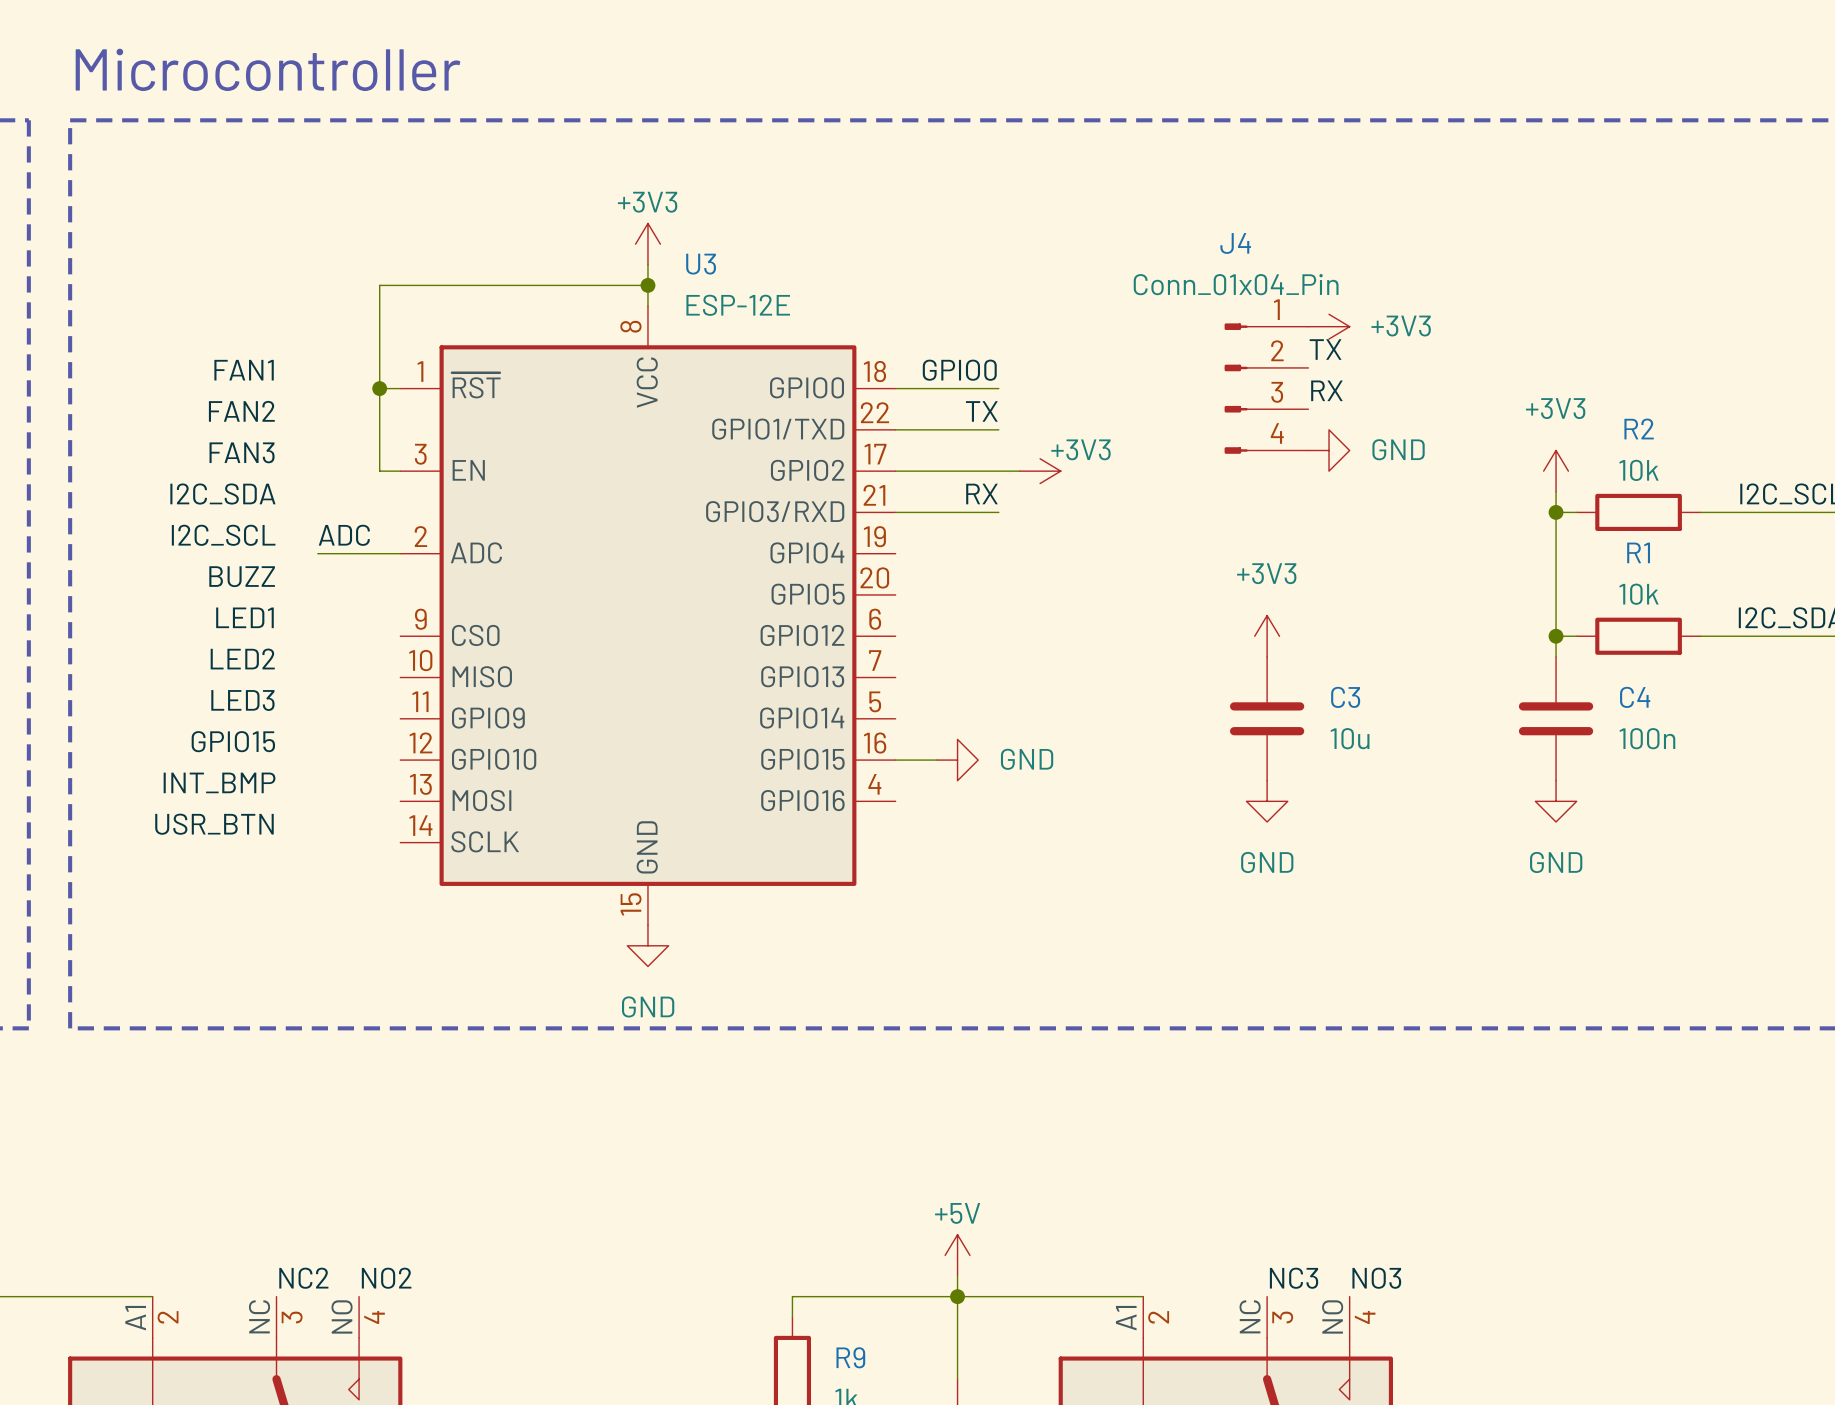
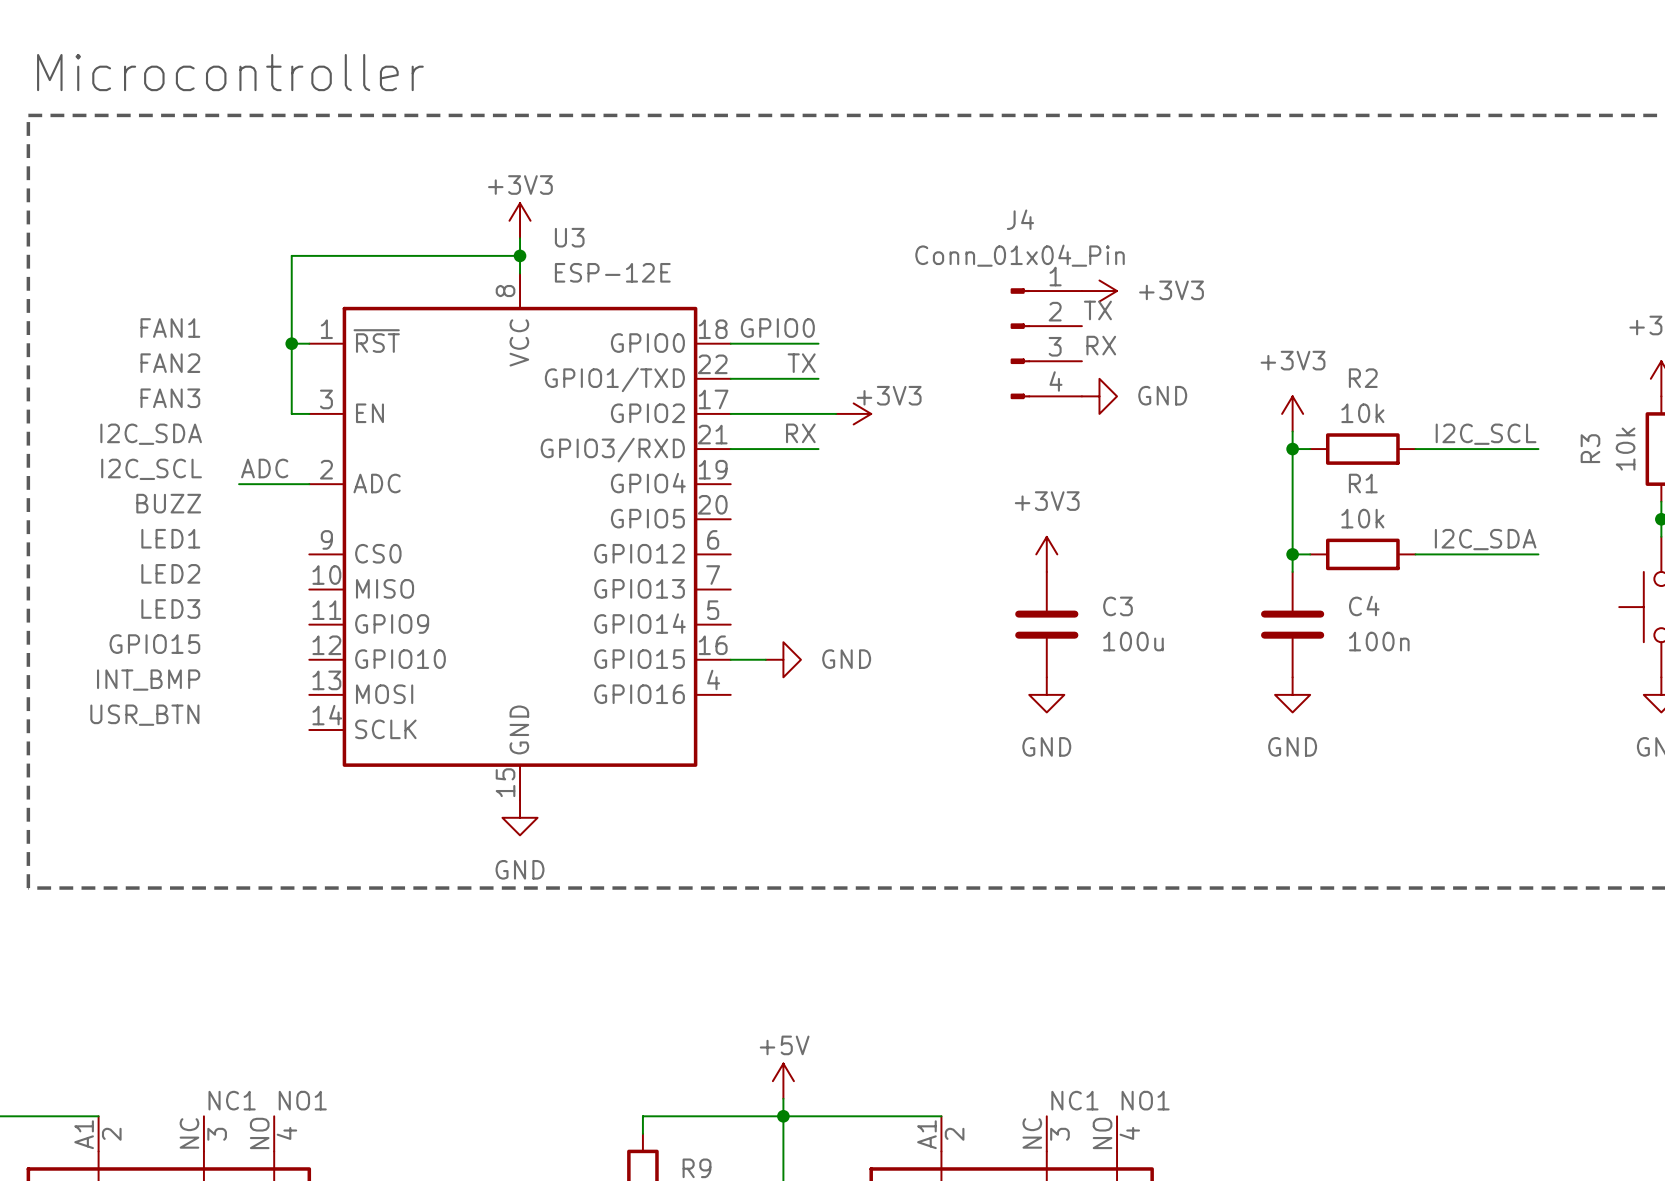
C3 value: 10u (1350, 738) -> 100u (1133, 641)
label: NC2 (303, 1278) -> NC1 (232, 1100)
label: NO2 (386, 1278) -> NO1 (302, 1100)
label: NC3 (1294, 1278) -> NC1 (1074, 1100)
label: NO3 (1376, 1278) -> NO1 (1145, 1100)

